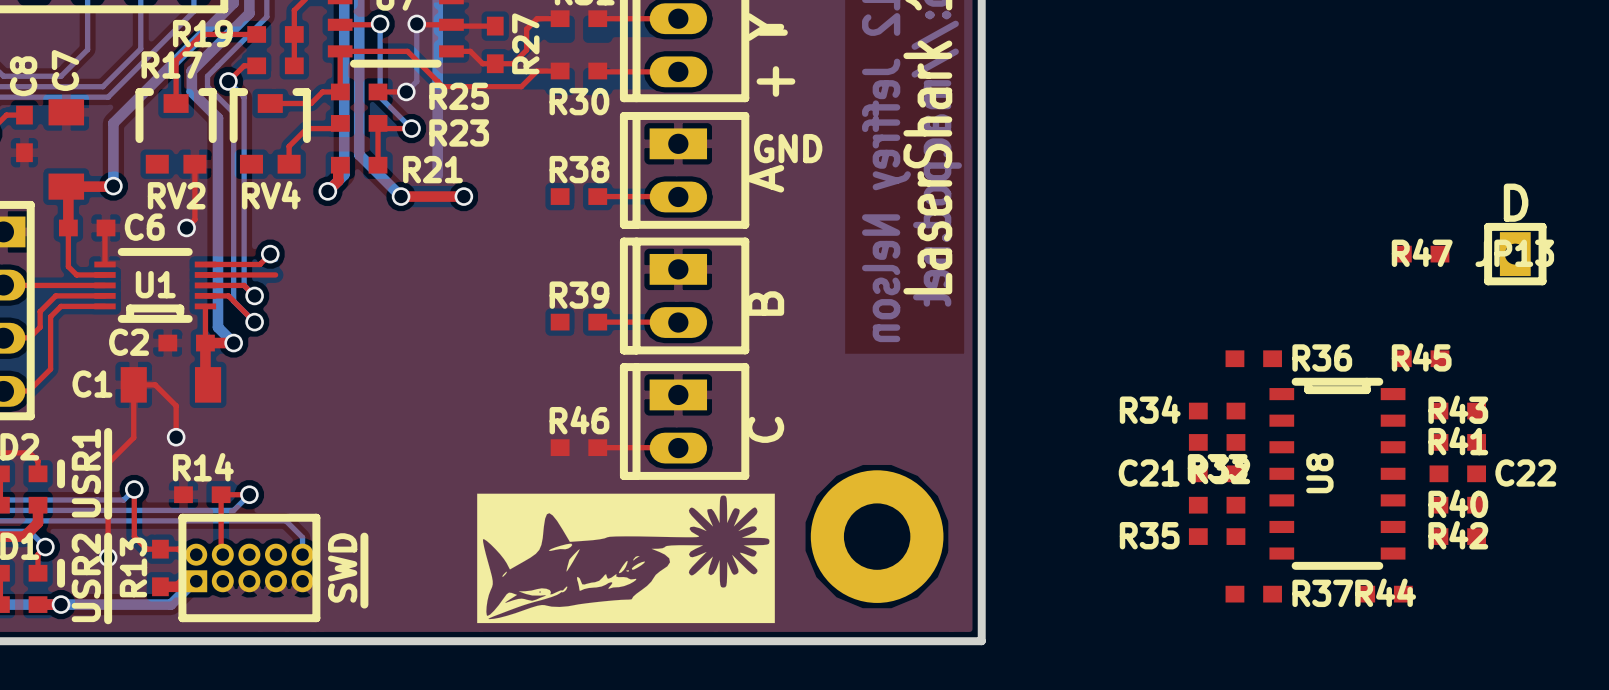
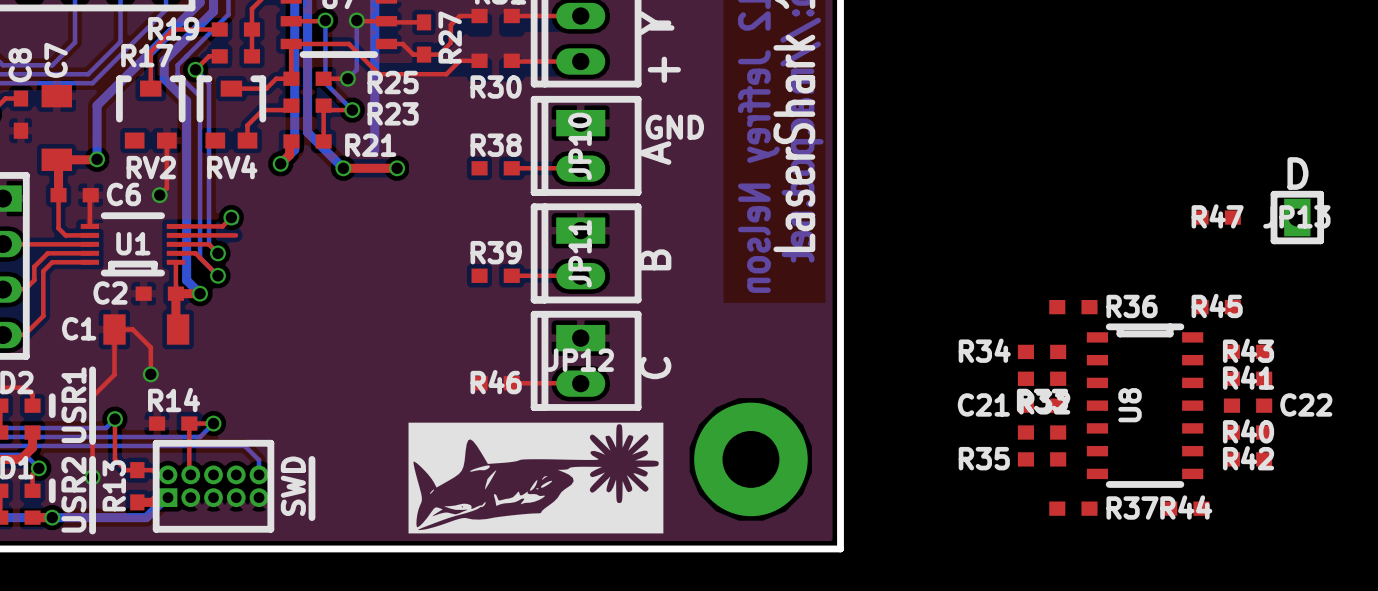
JP10 name: none -> JP10 (580, 146)
JP11 name: none -> JP11 (580, 253)
R46 name position: R46 (579, 420) -> R46 (496, 382)
JP12 name: none -> JP12 (580, 360)

